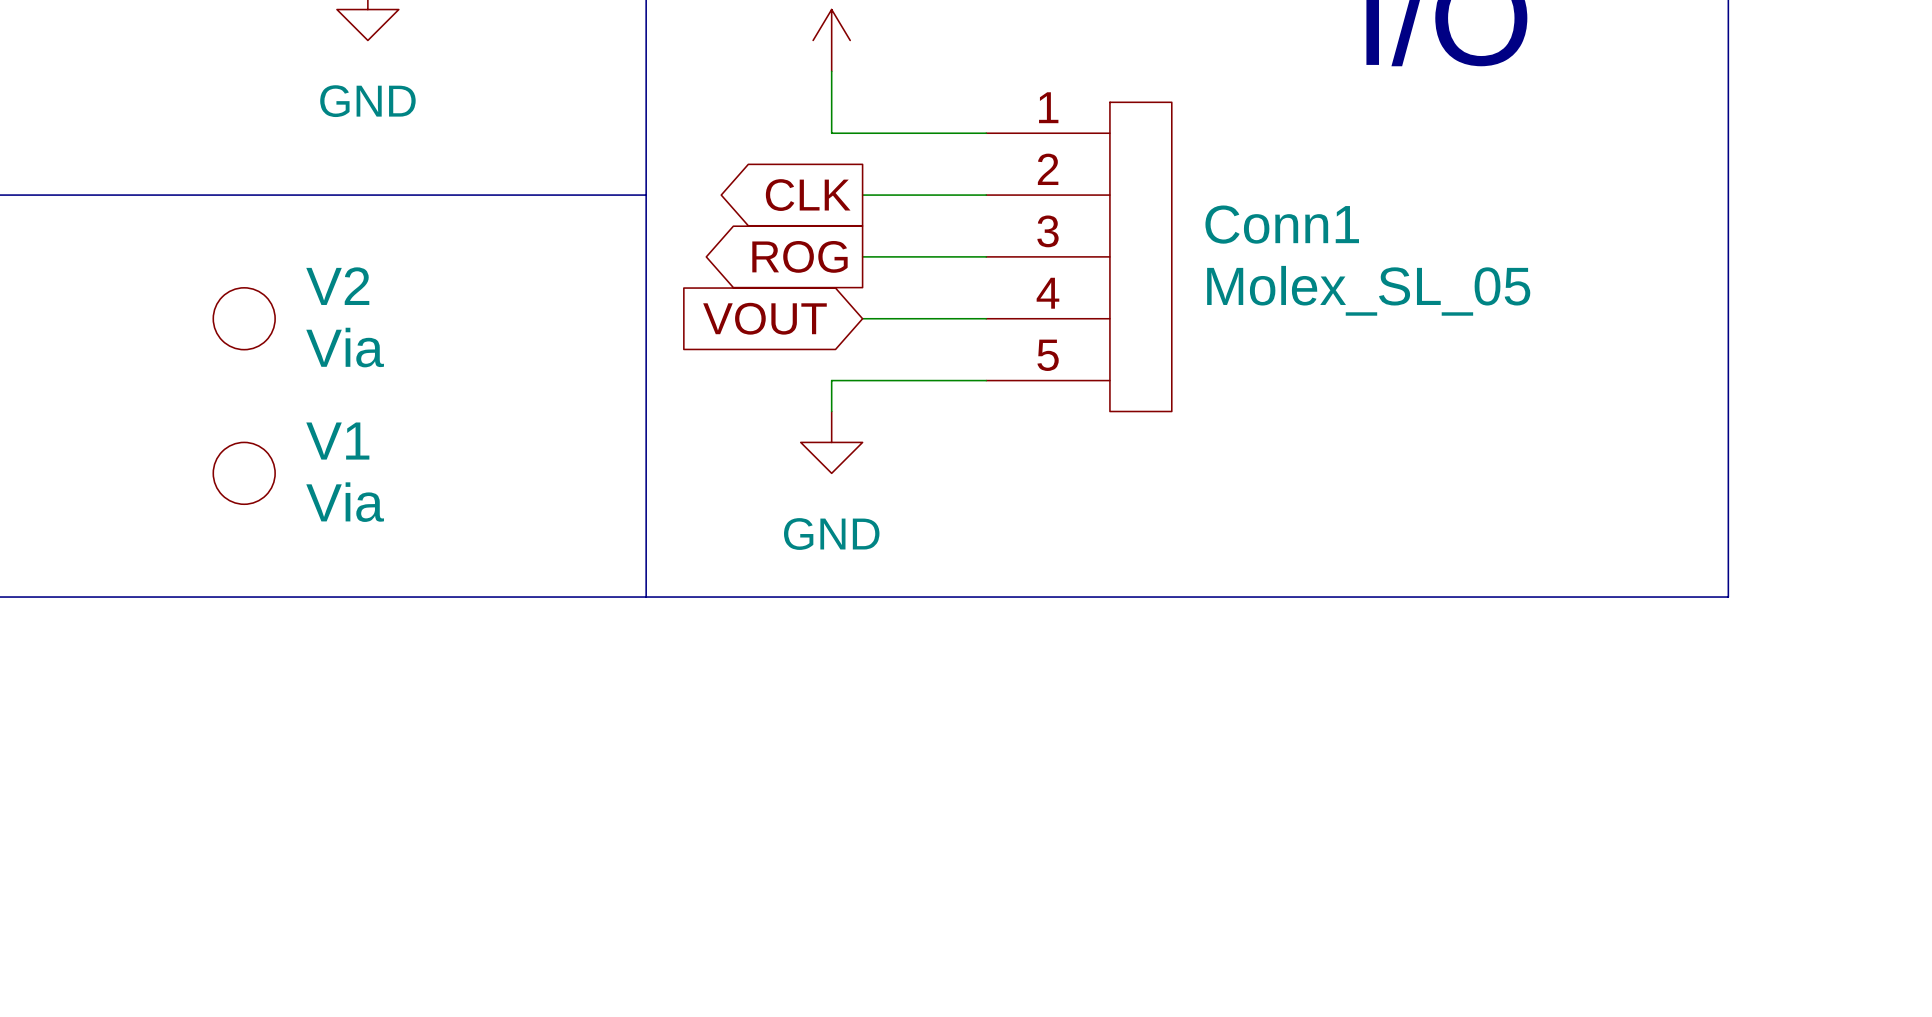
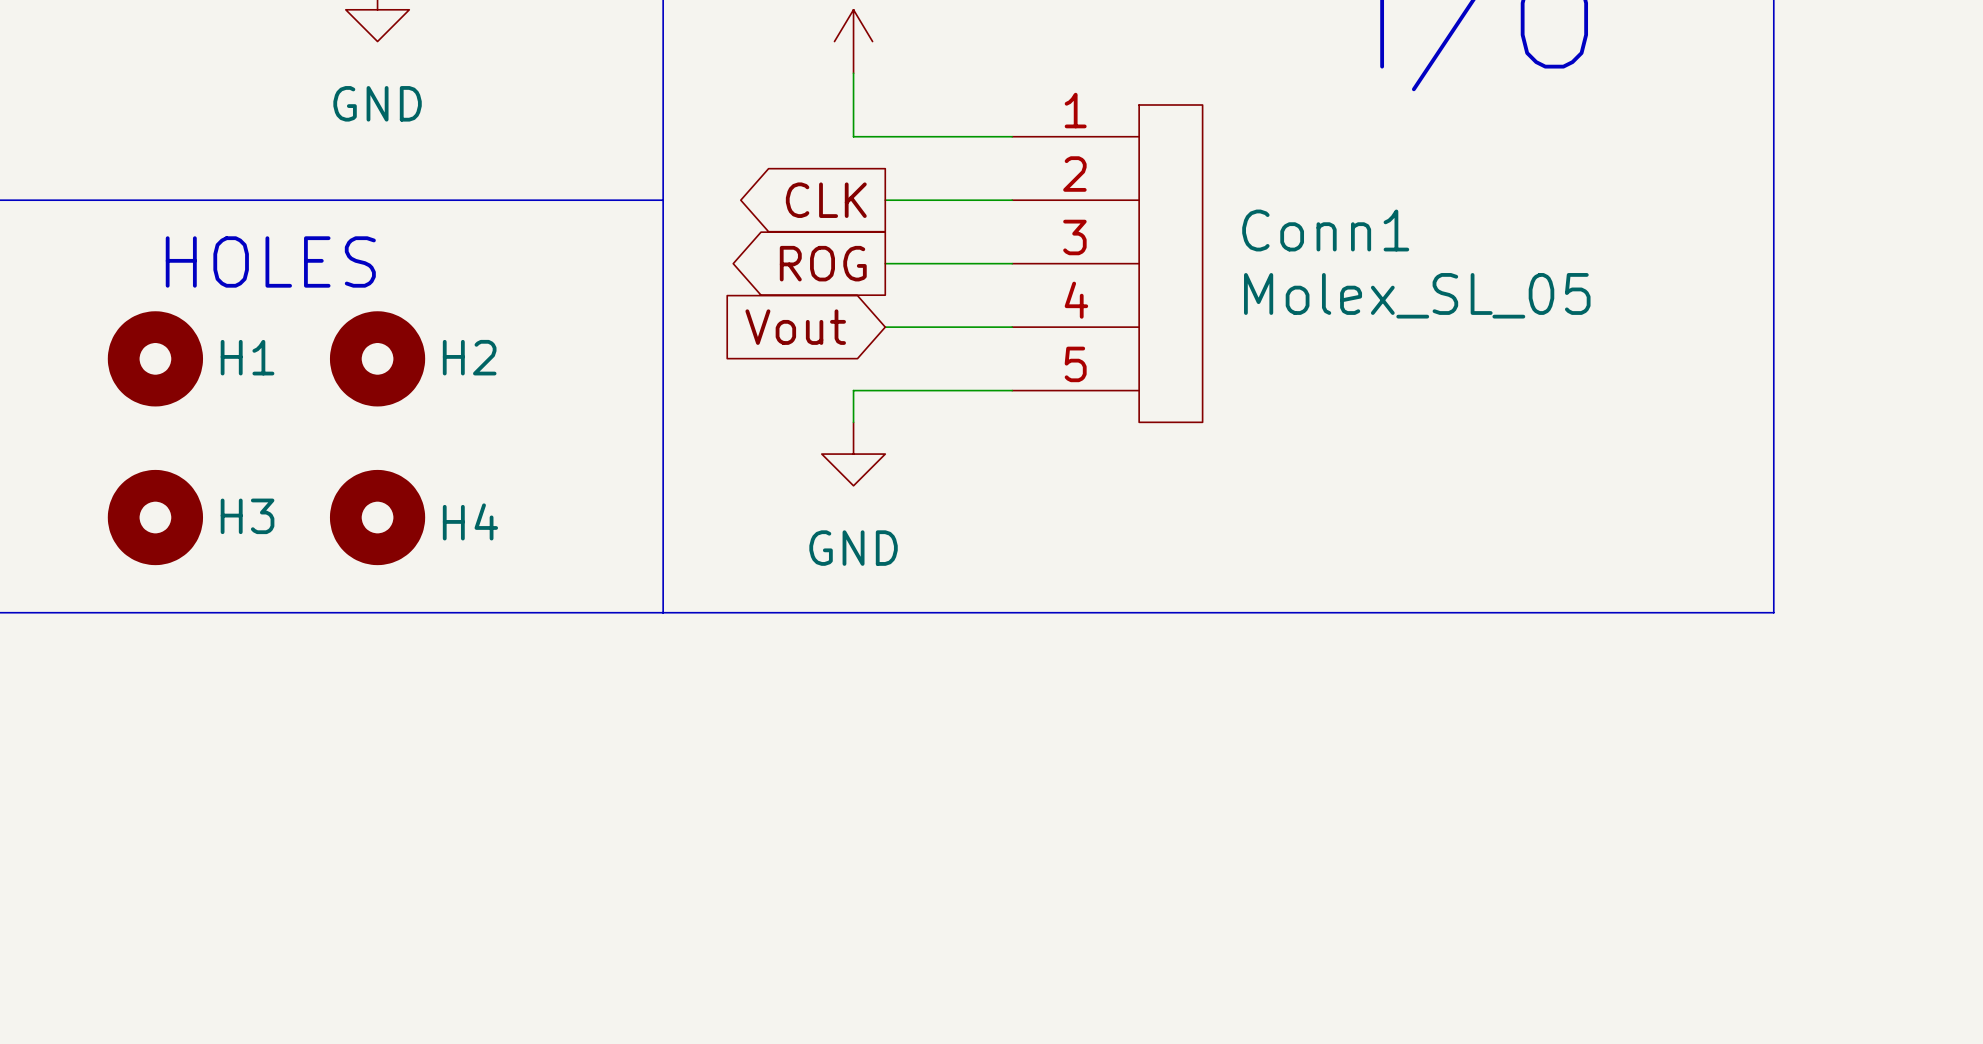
text: none -> HOLES (270, 261)
V2: Via (244, 318) -> none
global label: VOUT (764, 318) -> Vout (795, 327)
H1: none -> (155, 358)
H2: none -> (377, 358)
V1: Via (244, 473) -> none
H3: none -> (155, 517)
H4: none -> (377, 517)

